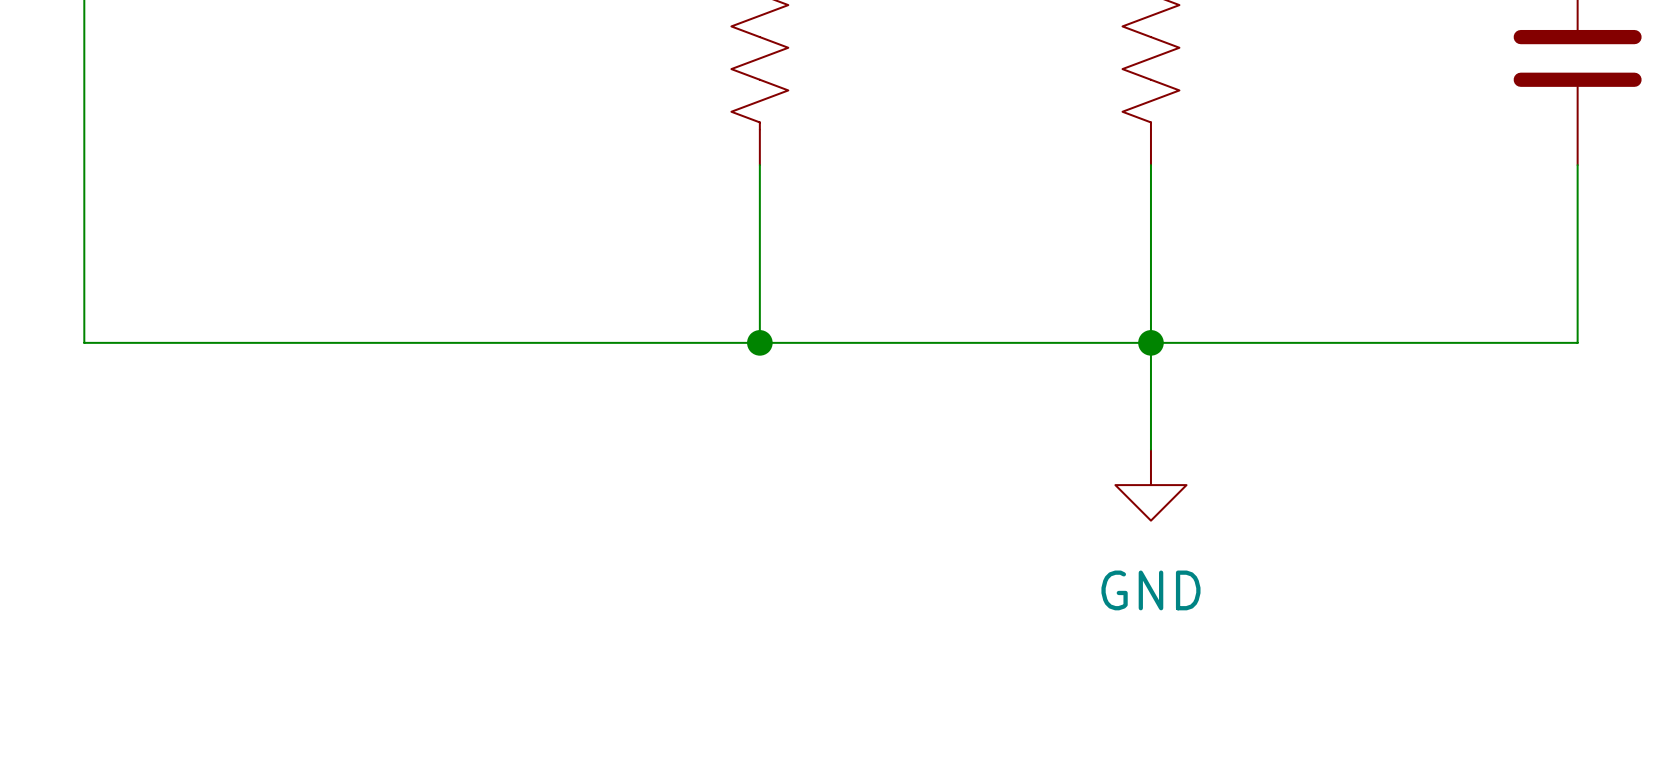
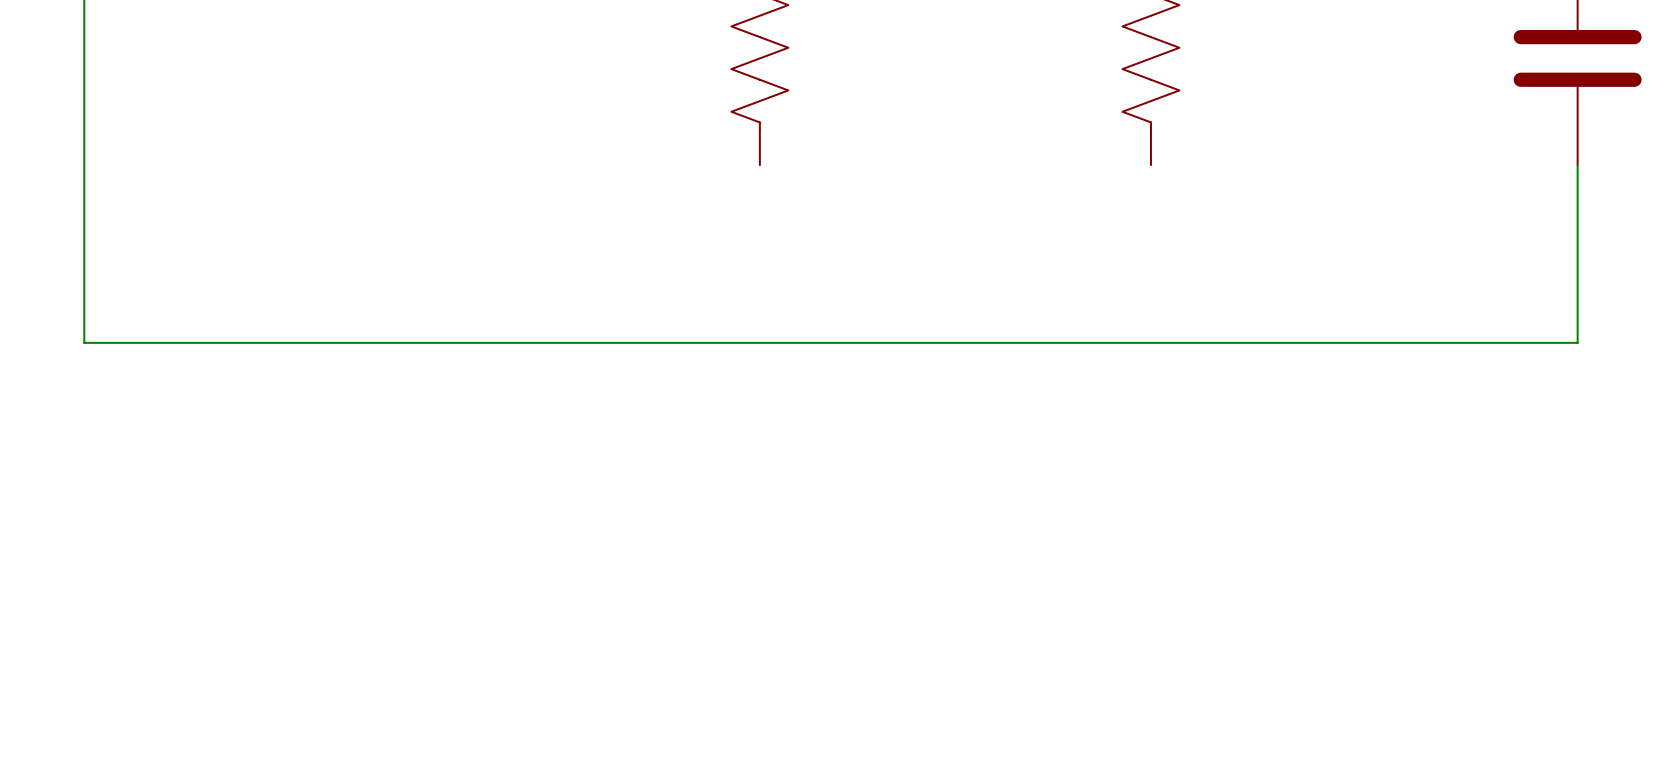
wire: (759, 165) (759, 342) -> none
wire: (1150, 165) (1150, 449) -> none
junction: (759, 342) -> none
junction: (1150, 342) -> none
power symbol: GND (1150, 485) -> none

